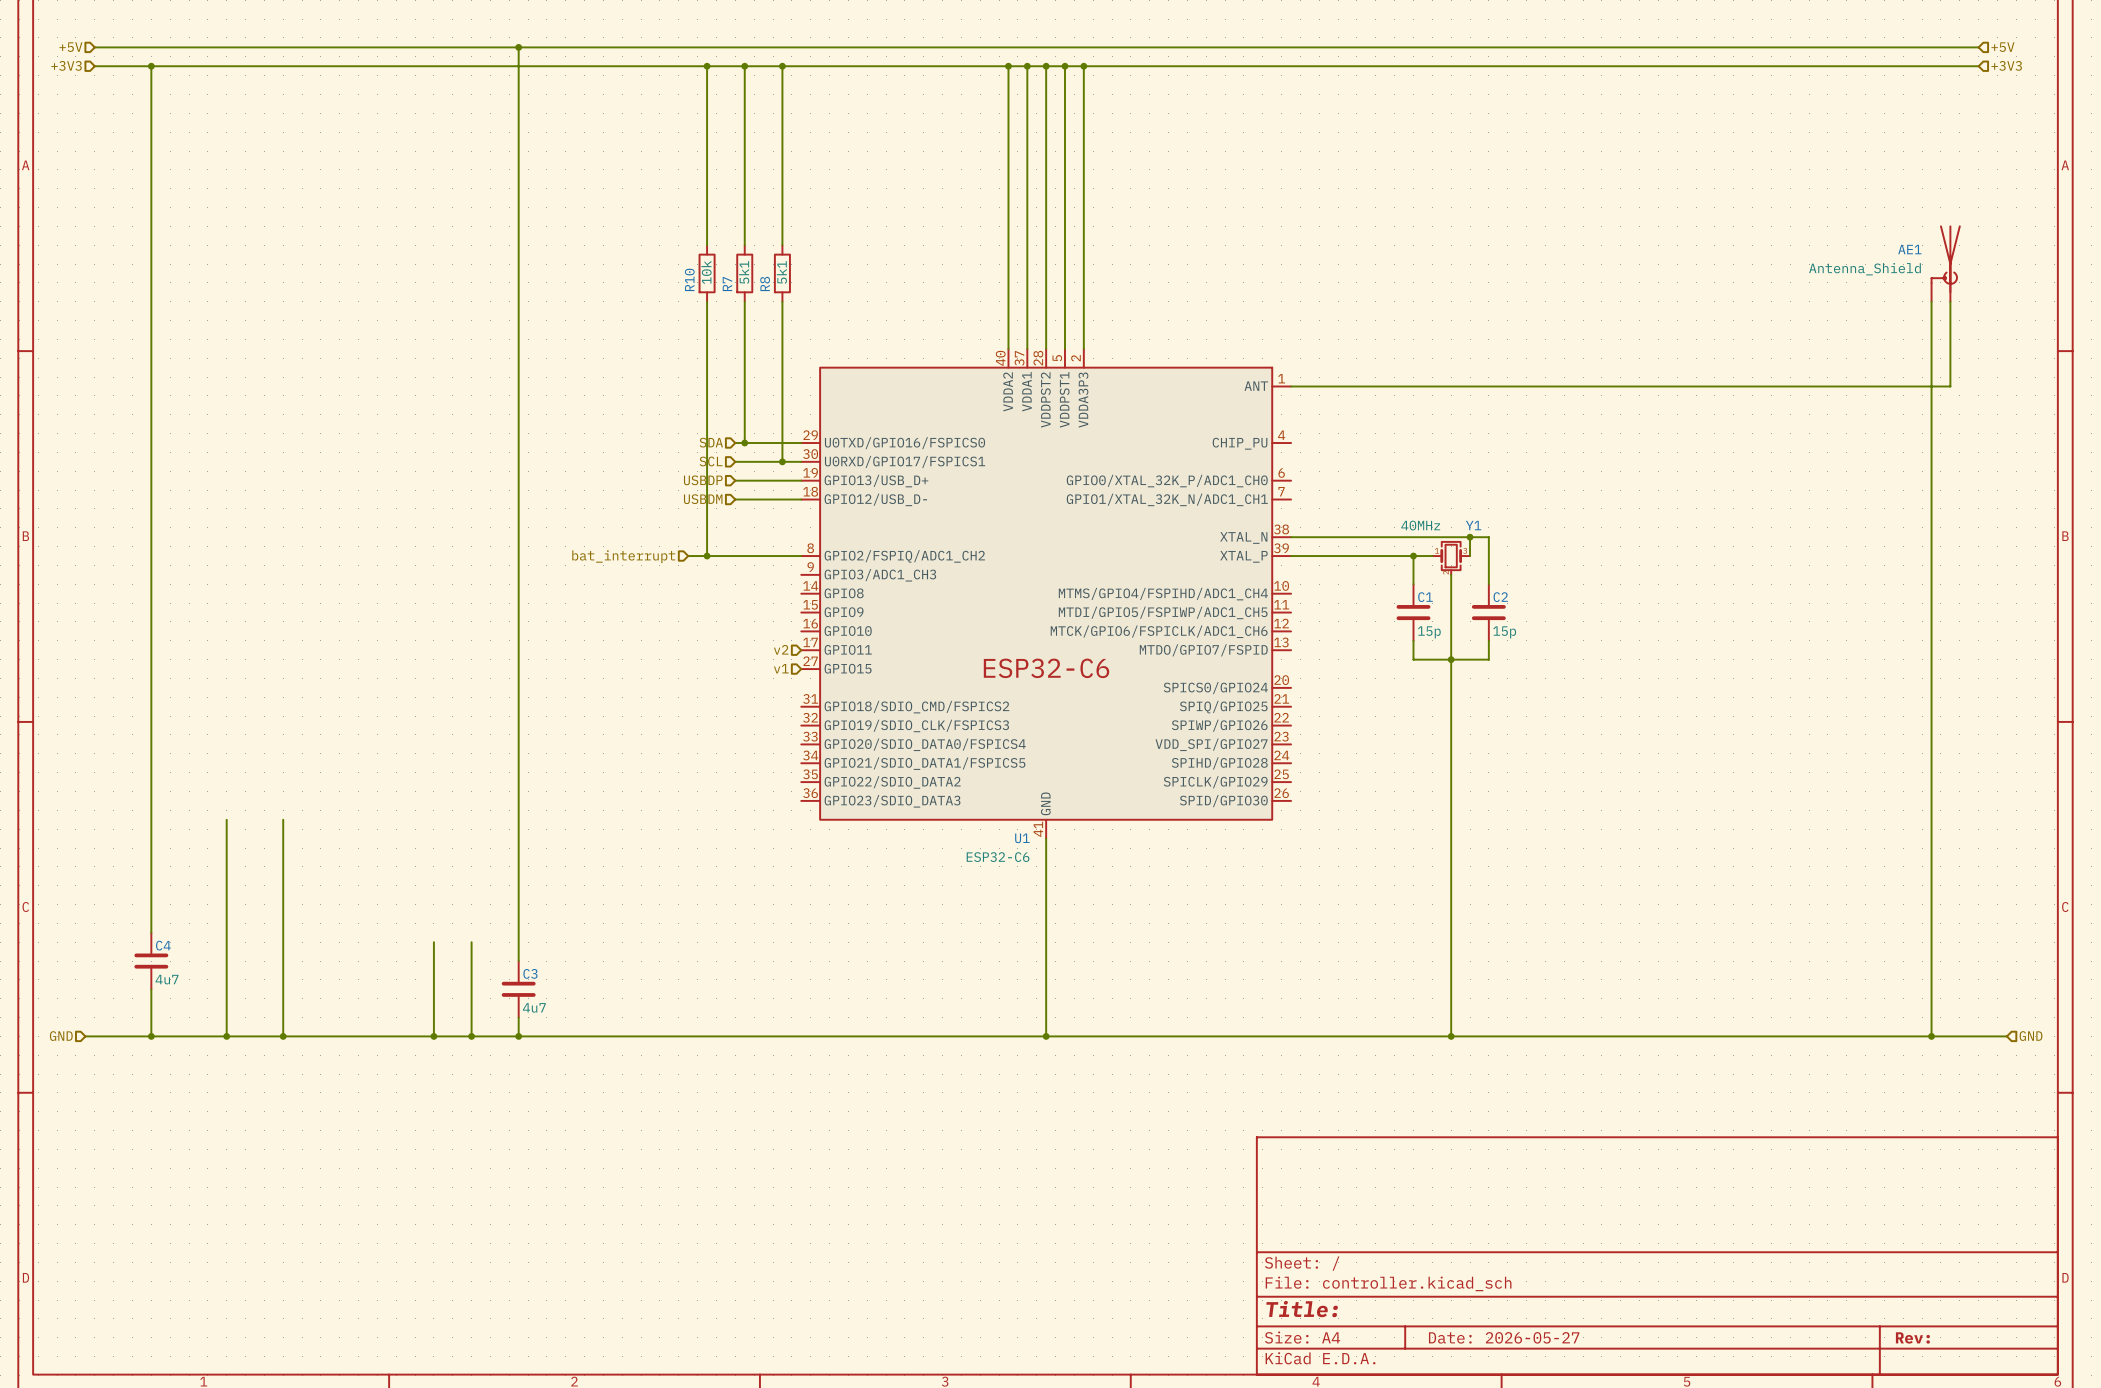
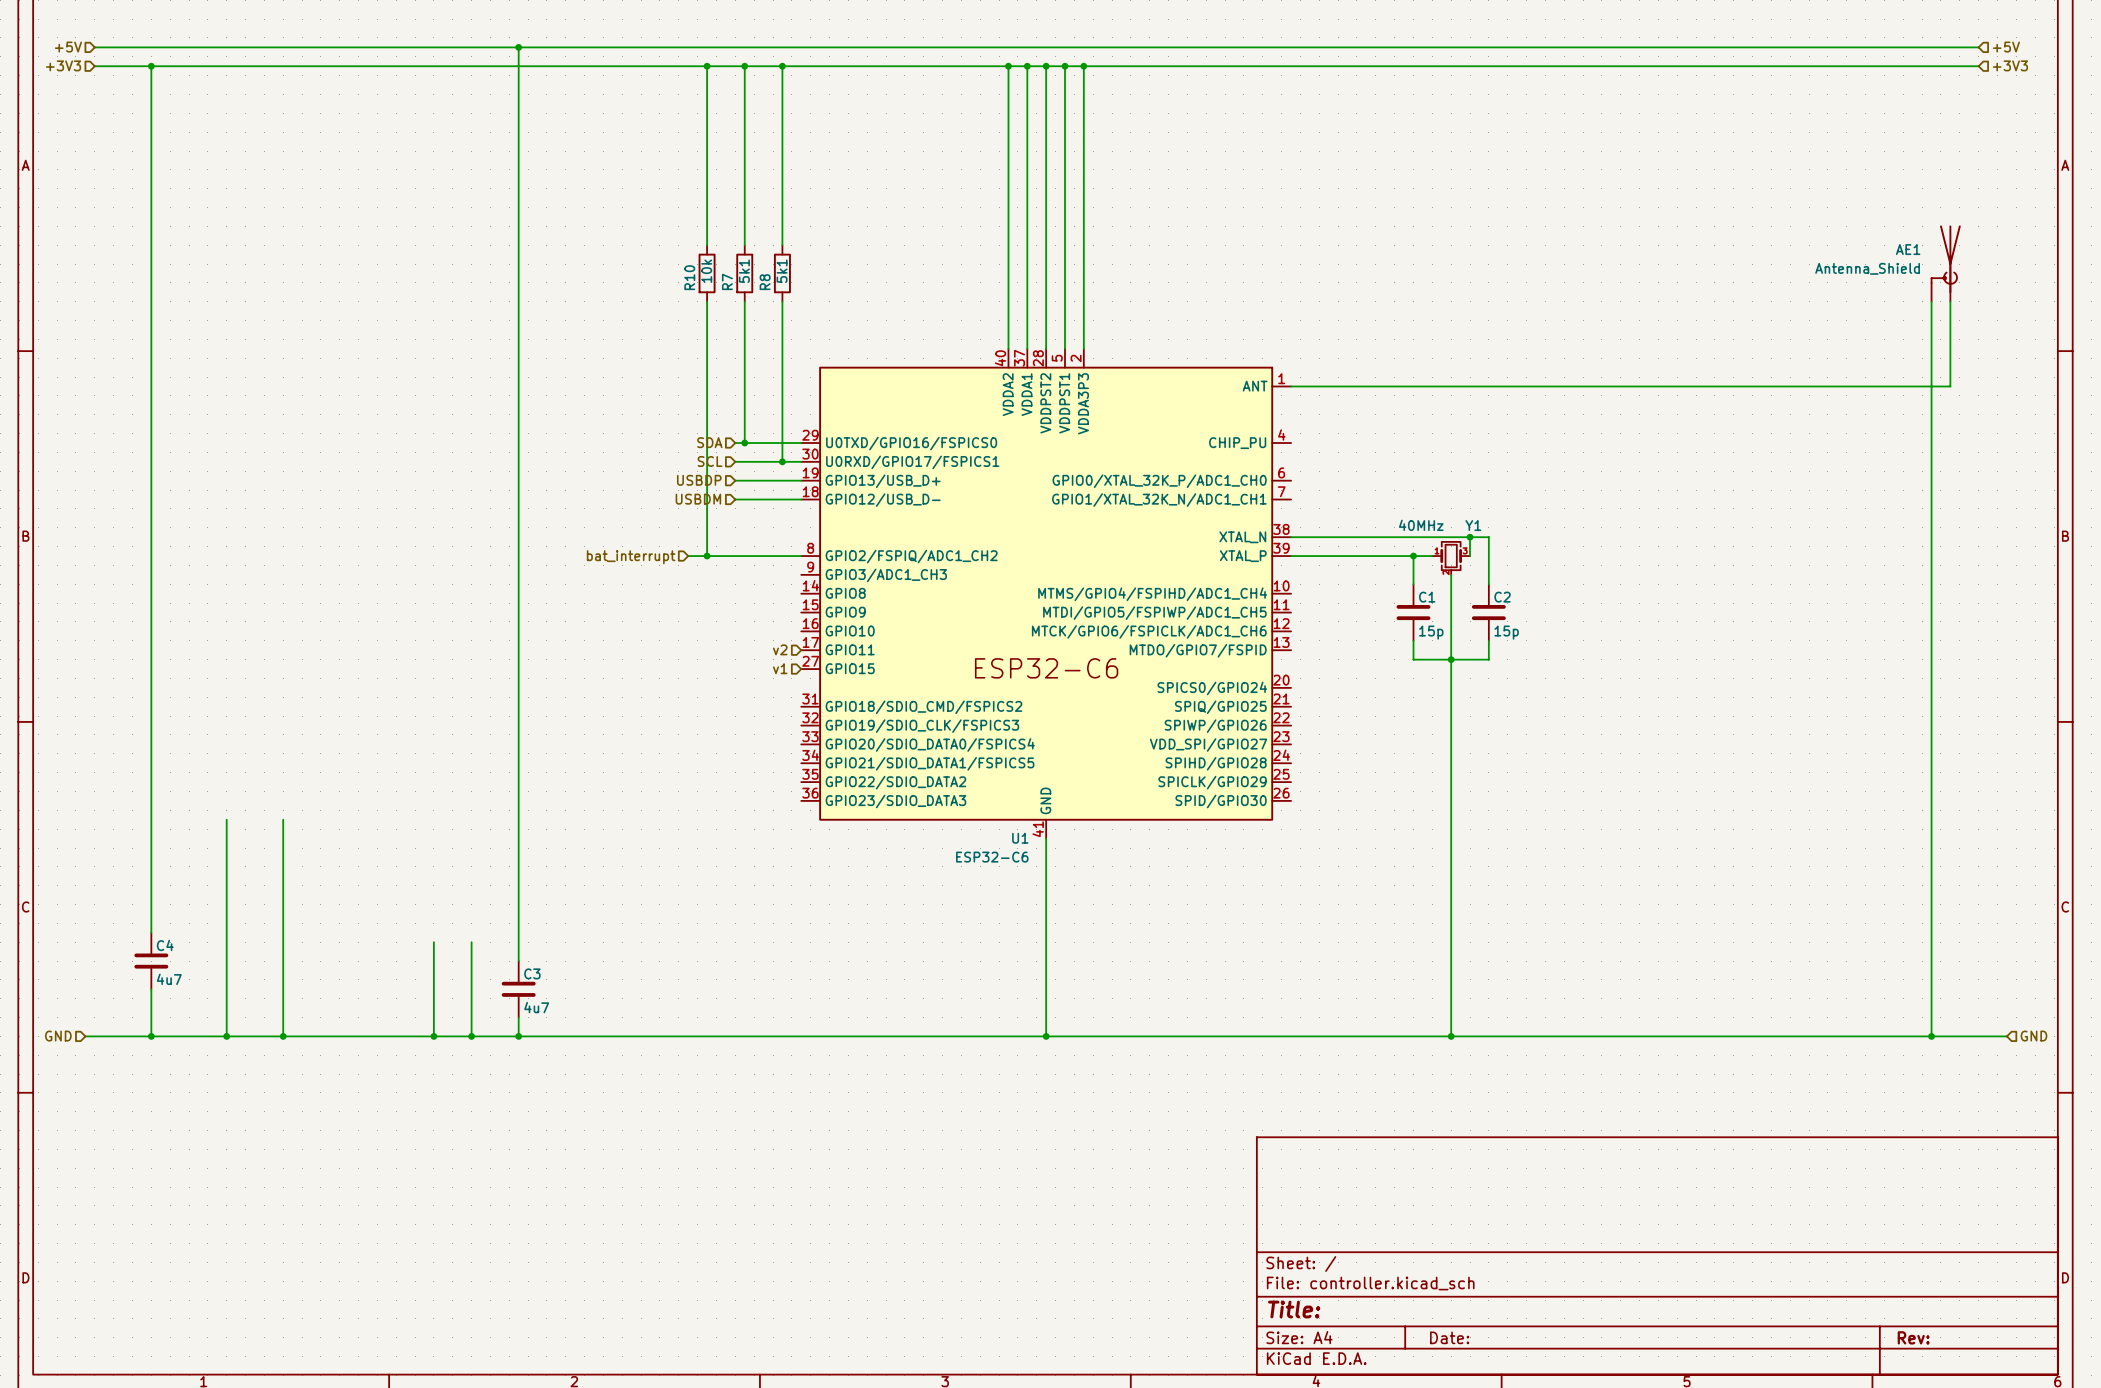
title block: Date: 2026-05-27 (1504, 1337) -> Date: (1449, 1337)

